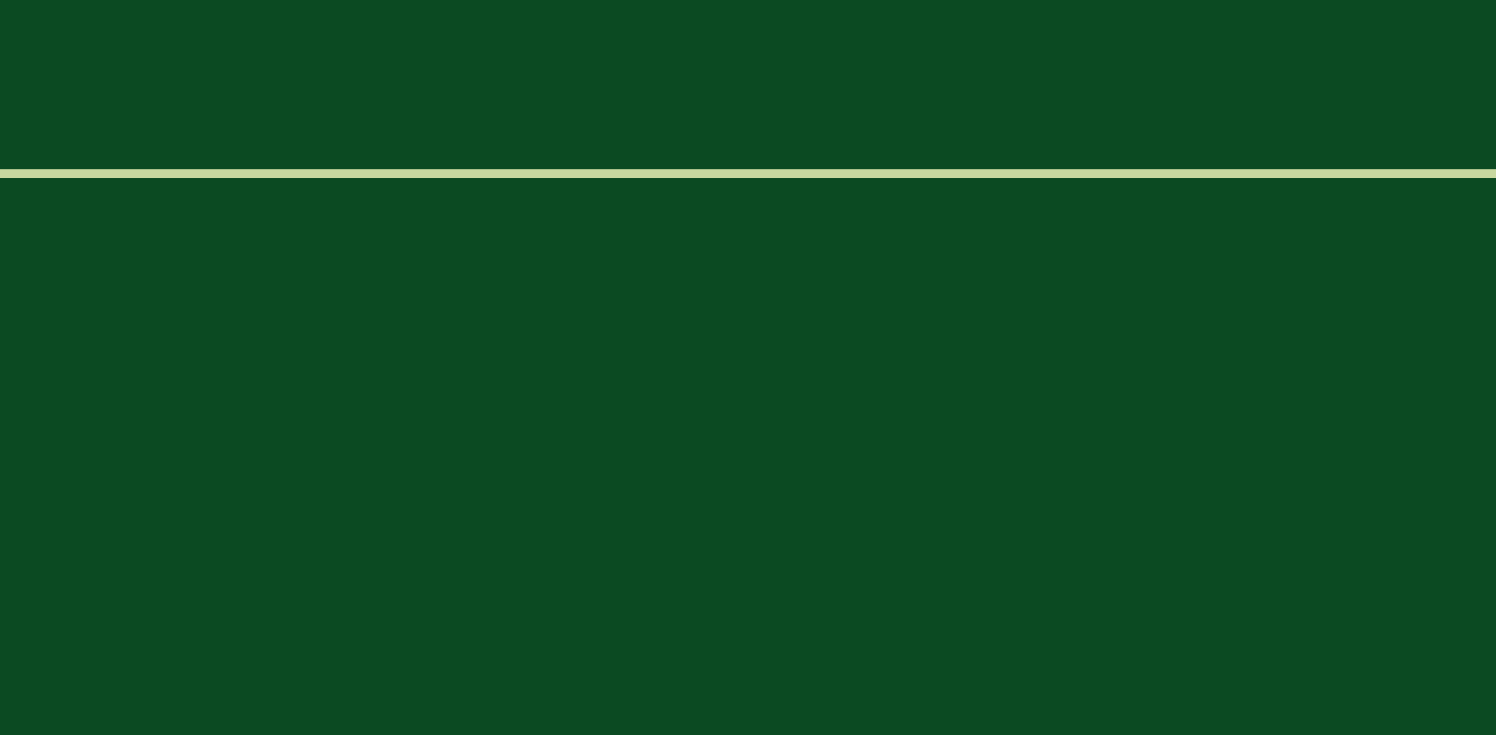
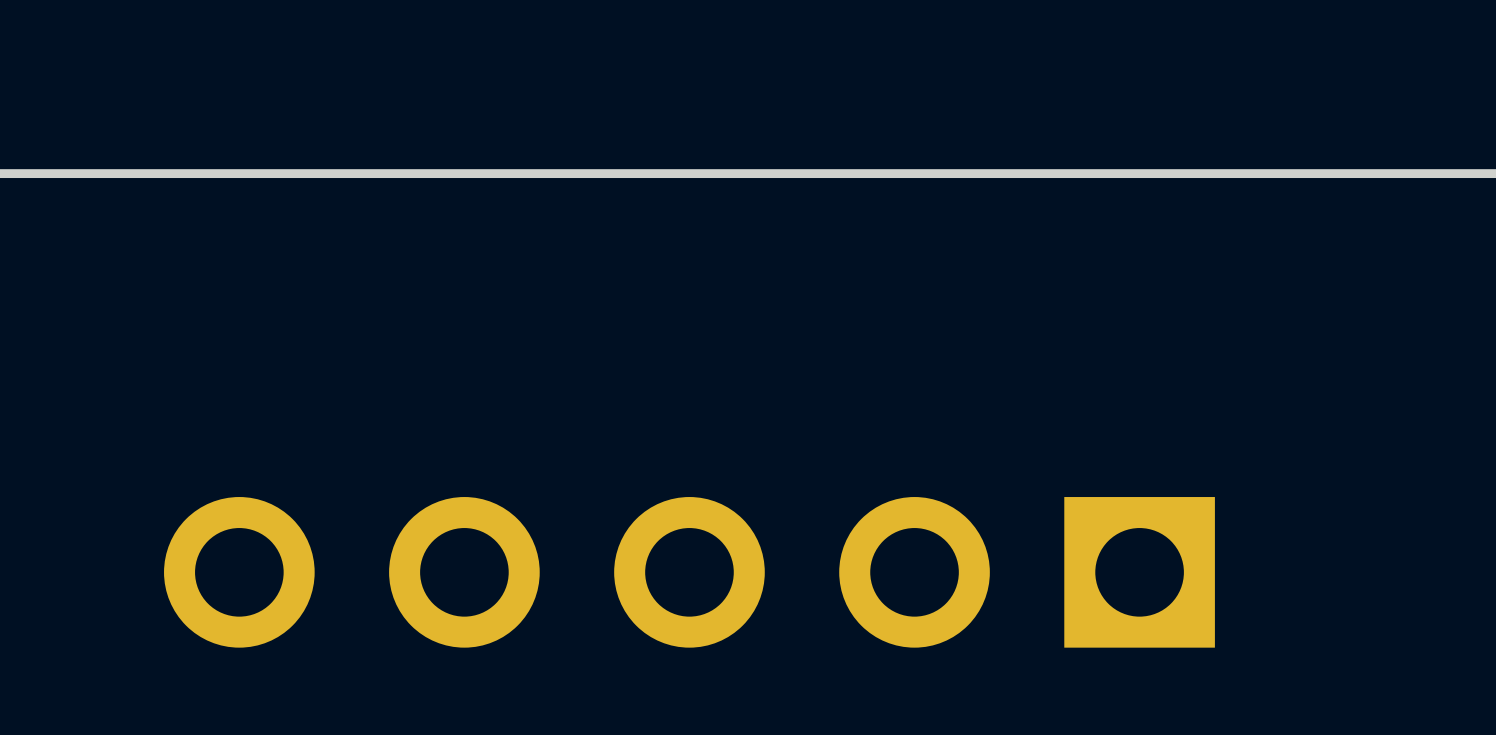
part: none -> (689, 572)

